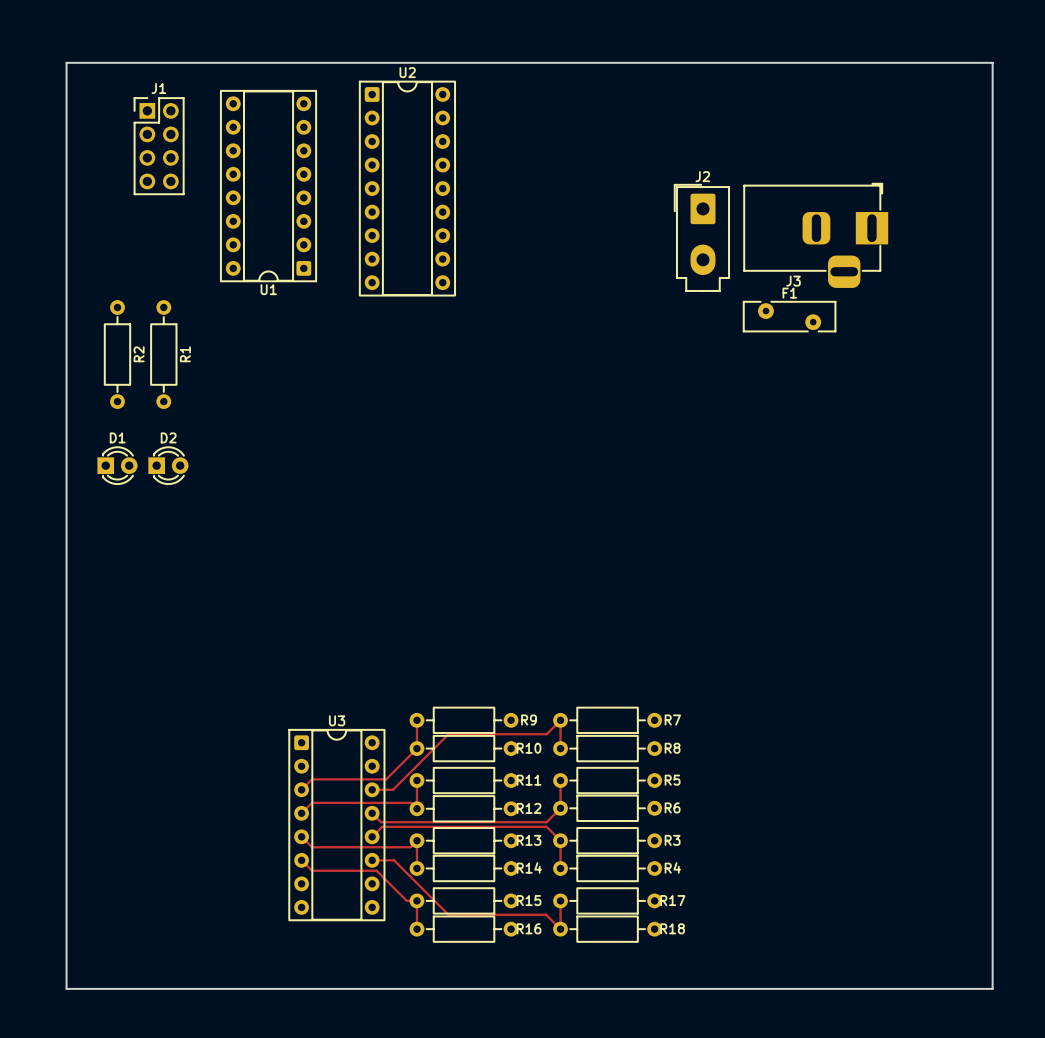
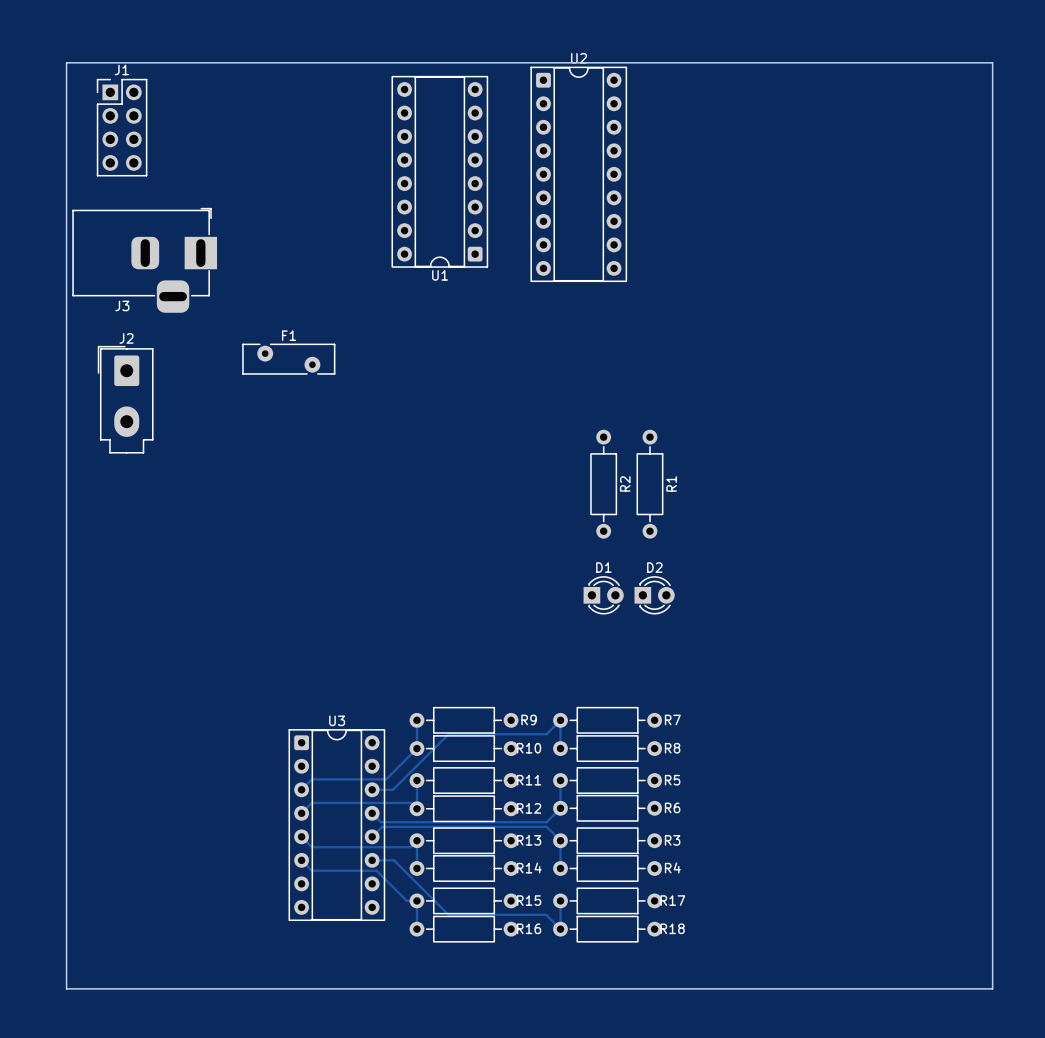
J1 position: (159, 146) -> (122, 127)
U1 position: (268, 186) -> (439, 171)
U2 position: (407, 188) -> (578, 174)
J3 position: (815, 235) -> (144, 260)
J2 position: (701, 237) -> (125, 399)
F1 position: (789, 316) -> (288, 359)
R2 position: (117, 354) -> (603, 484)
R1 position: (163, 354) -> (649, 484)
D1 position: (117, 465) -> (603, 595)
D2 position: (168, 465) -> (654, 595)

